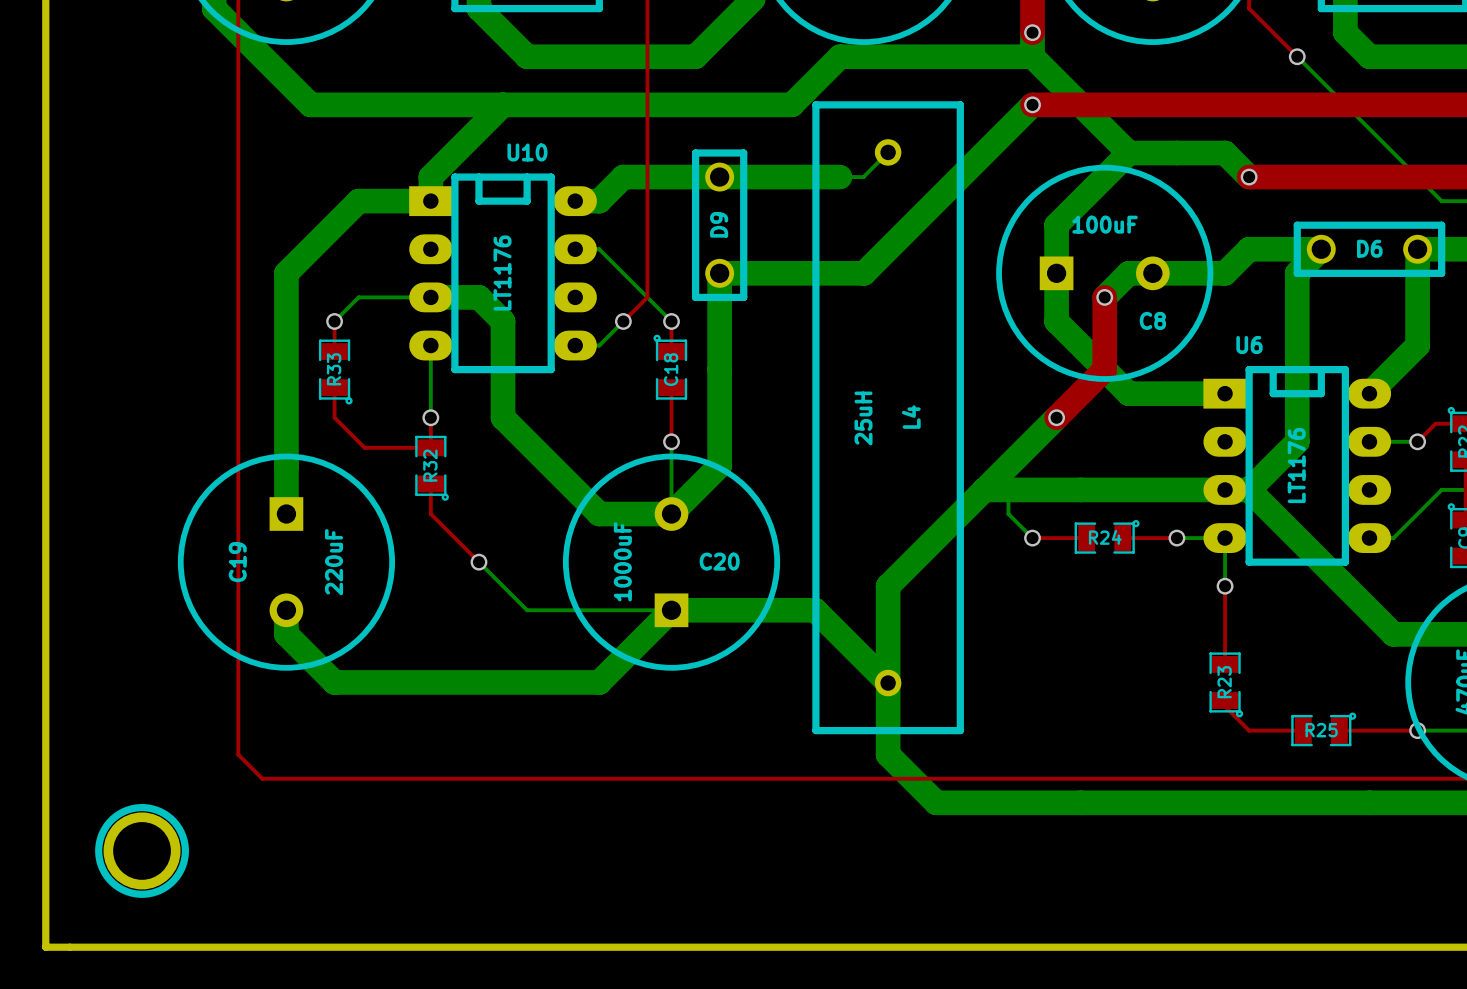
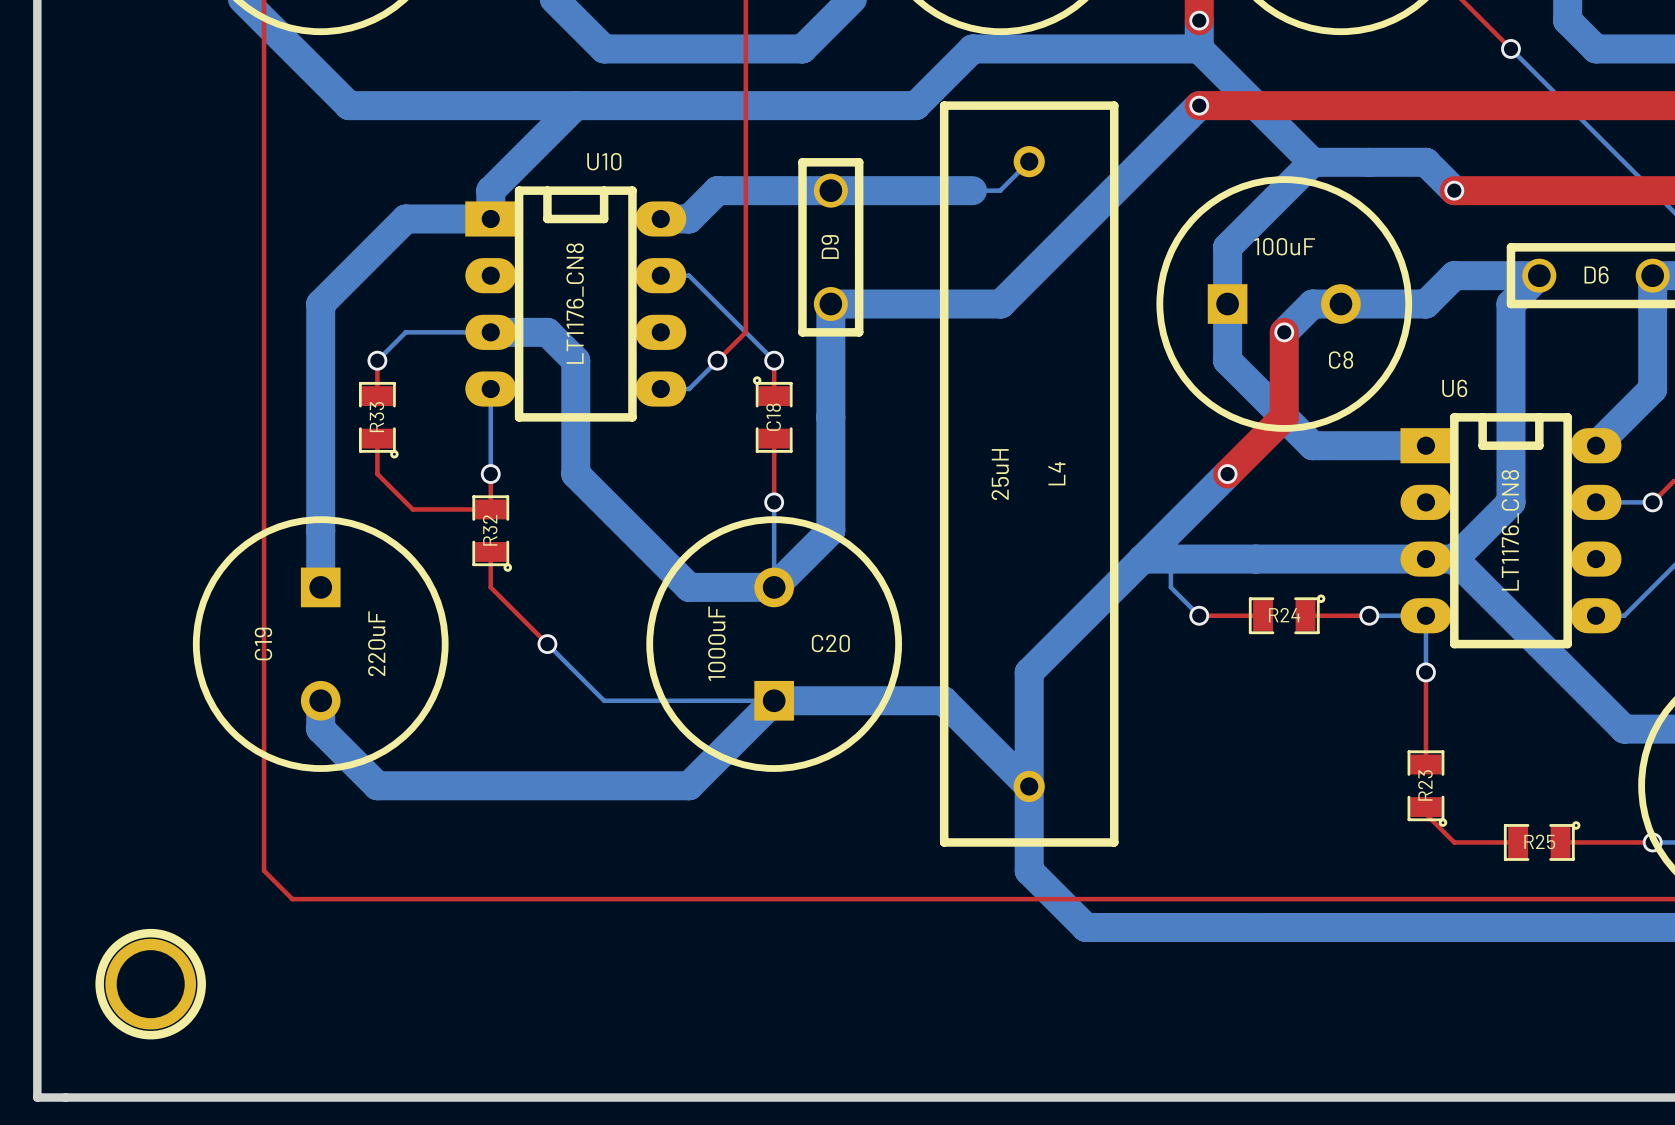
U10 value: LT1176 (502, 272) -> LT1176_CN8 (575, 303)
U6 value: LT1176 (1296, 465) -> LT1176_CN8 (1510, 530)

